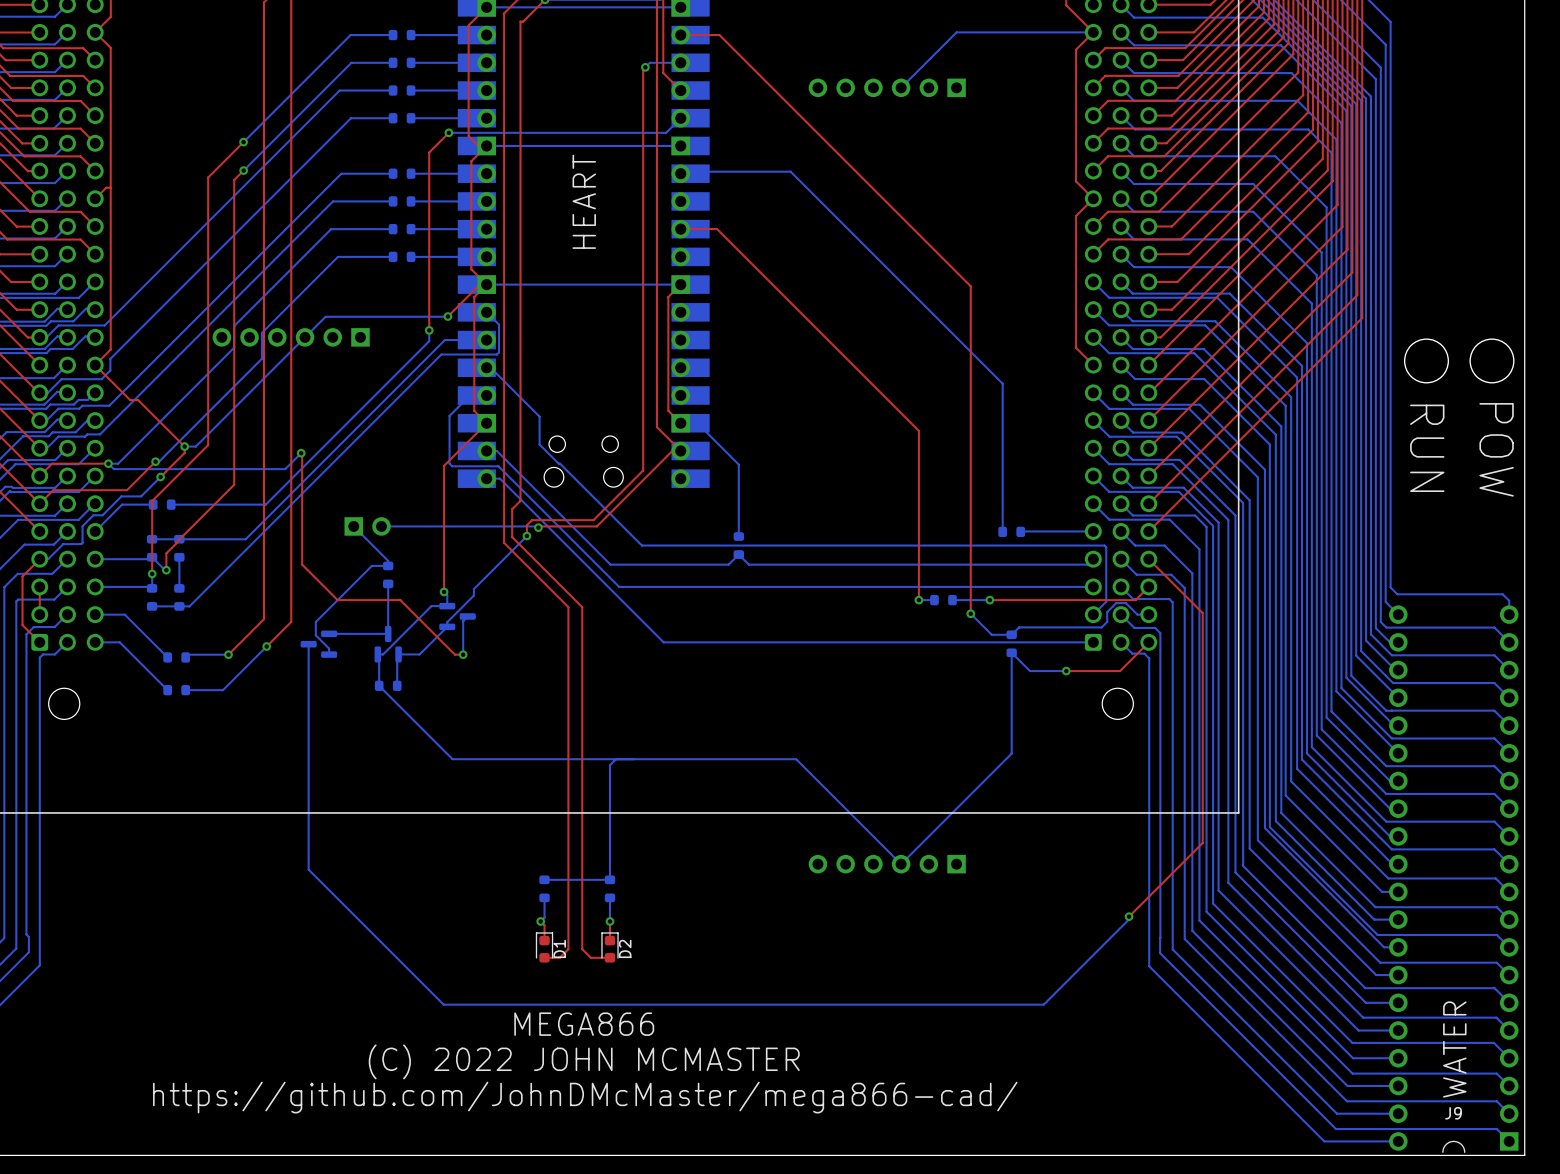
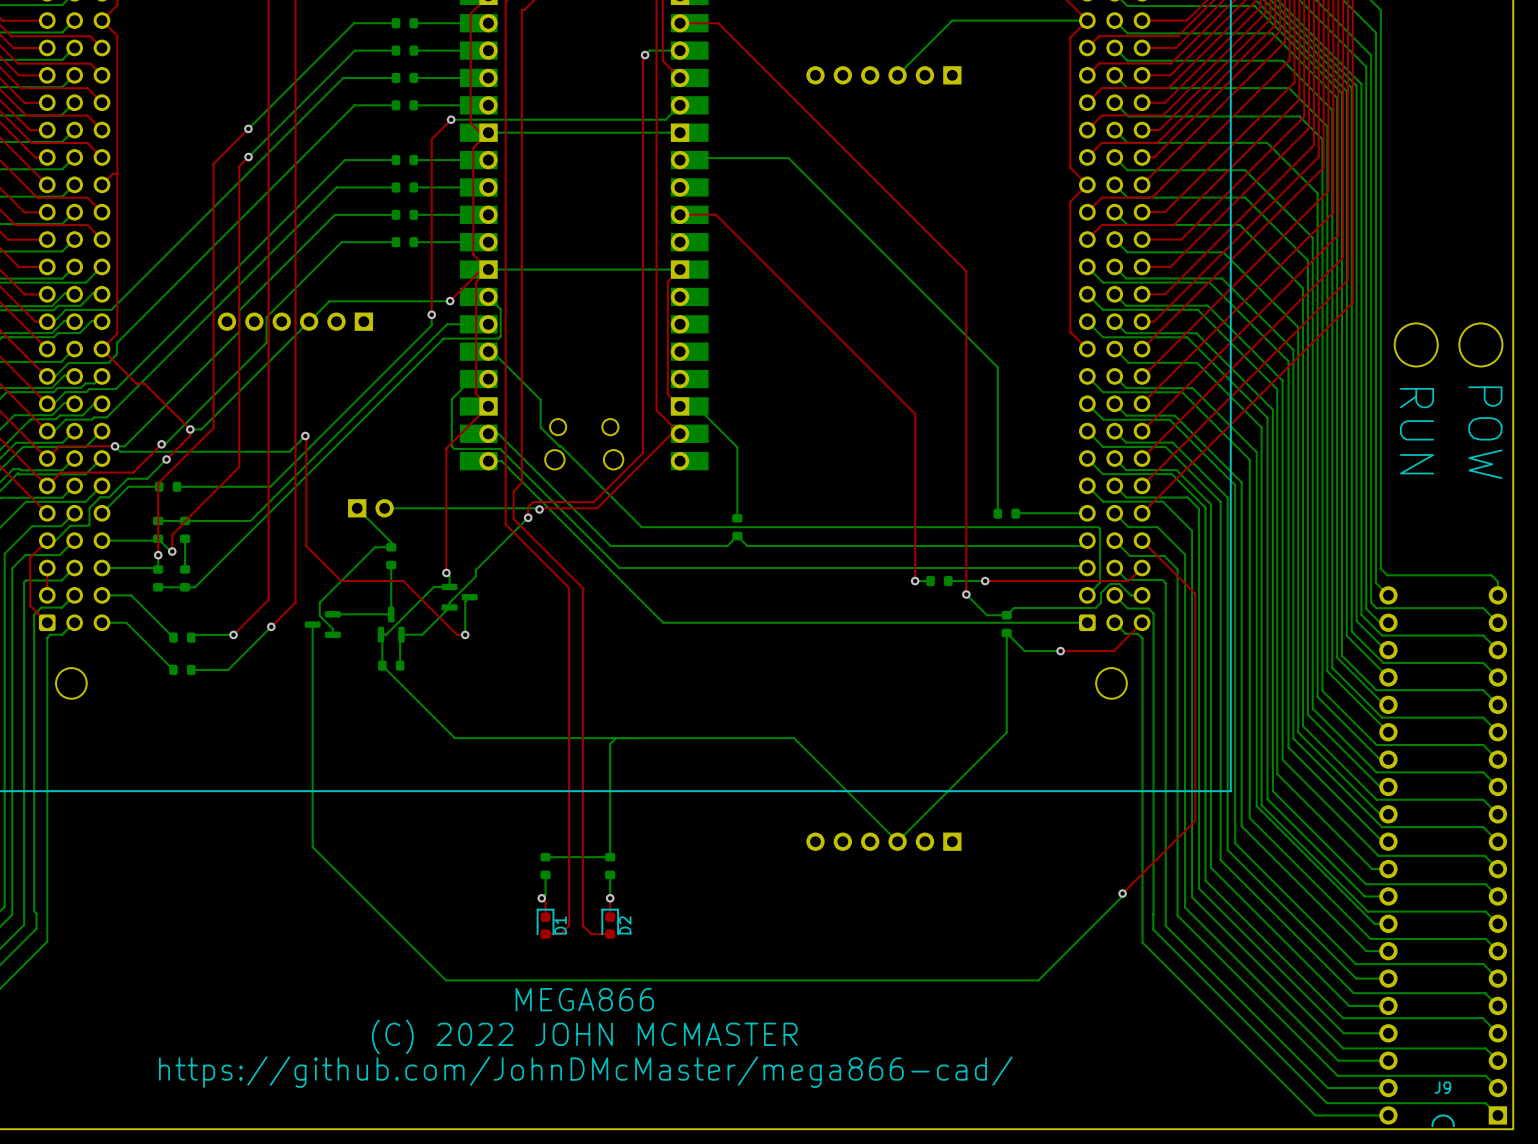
text: HEART (584, 201) -> none
text: WATER (1454, 1049) -> none

